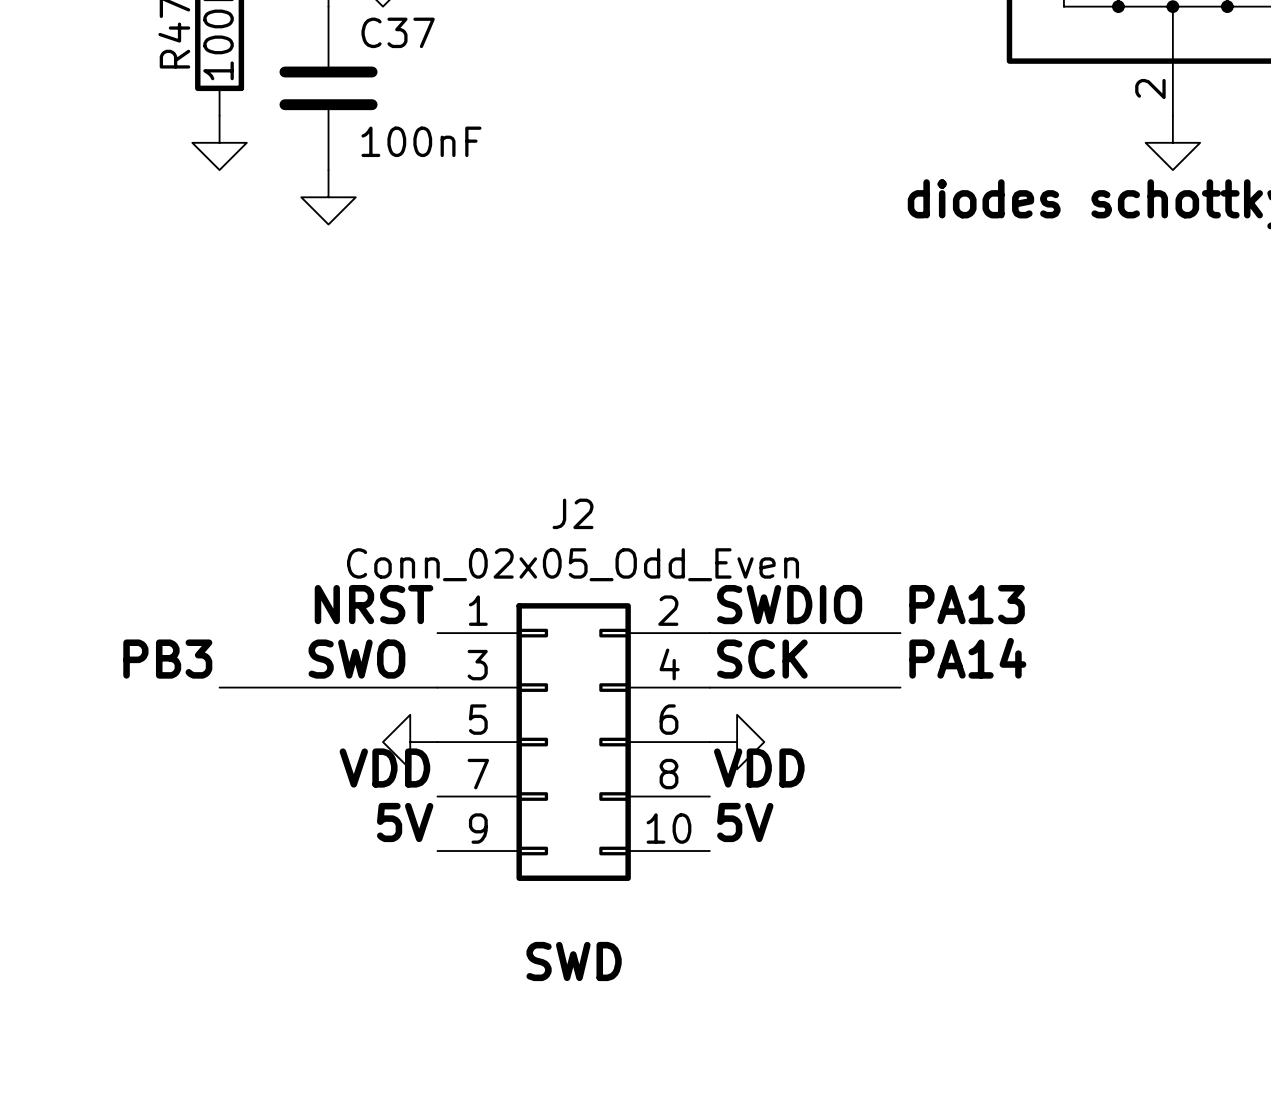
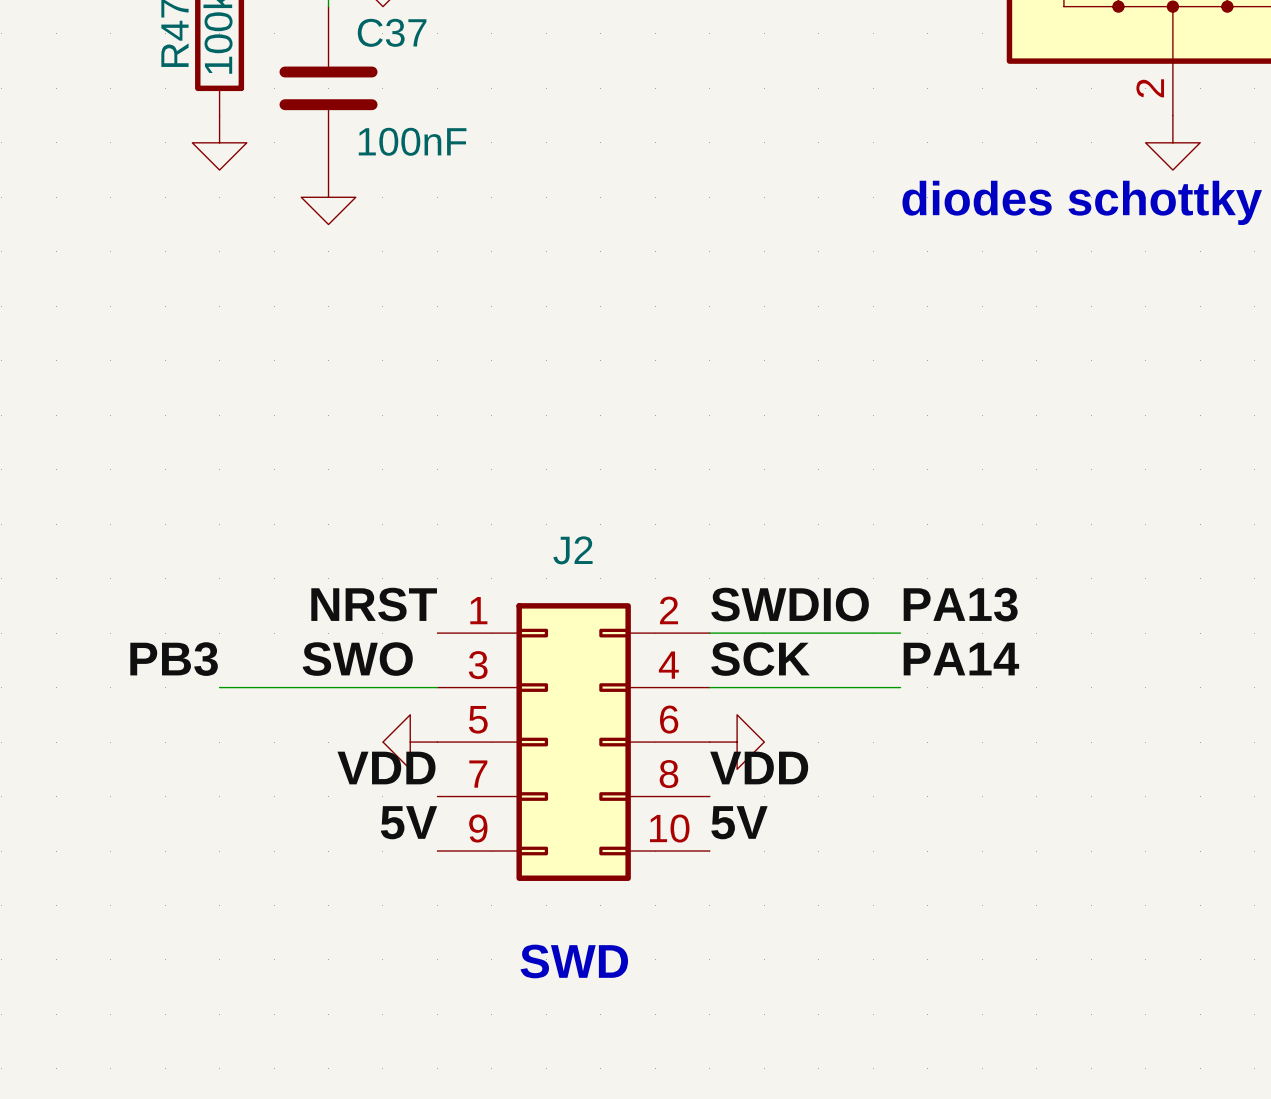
J2 name position: J2 (573, 513) -> J2 (572, 550)
J2 value: Conn_02x05_Odd_Even (573, 564) -> none

